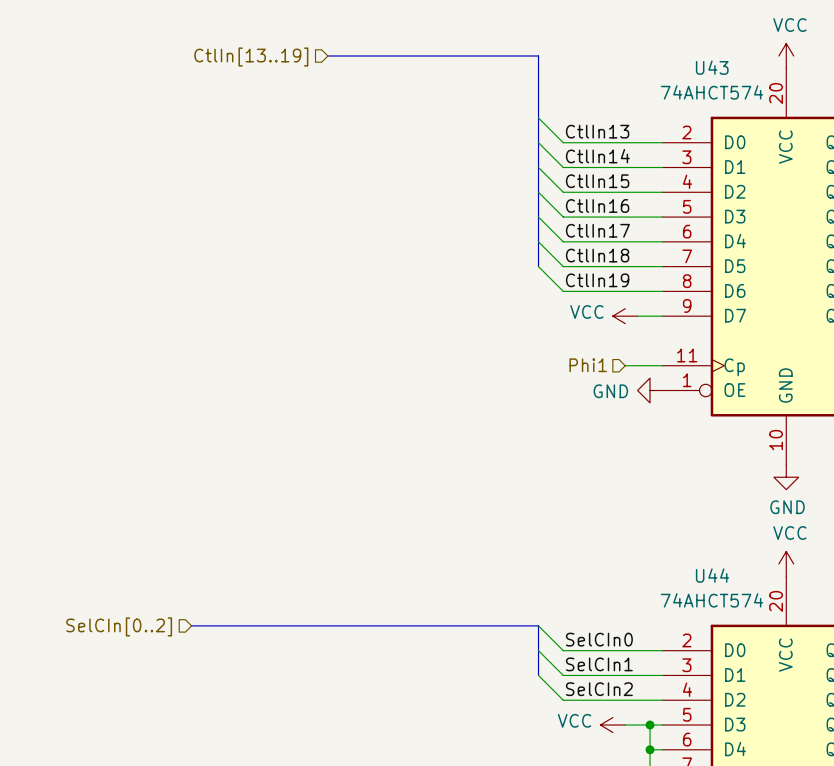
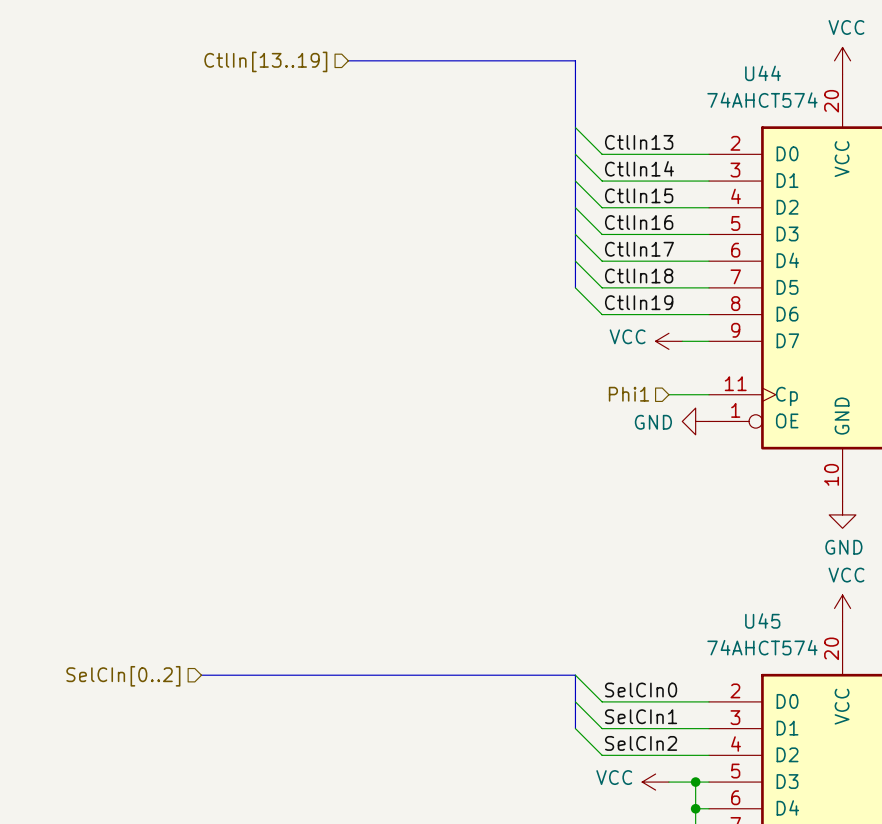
U43 name: U43 (712, 67) -> U44 (763, 73)
U44 name: U44 (712, 575) -> U45 (762, 620)

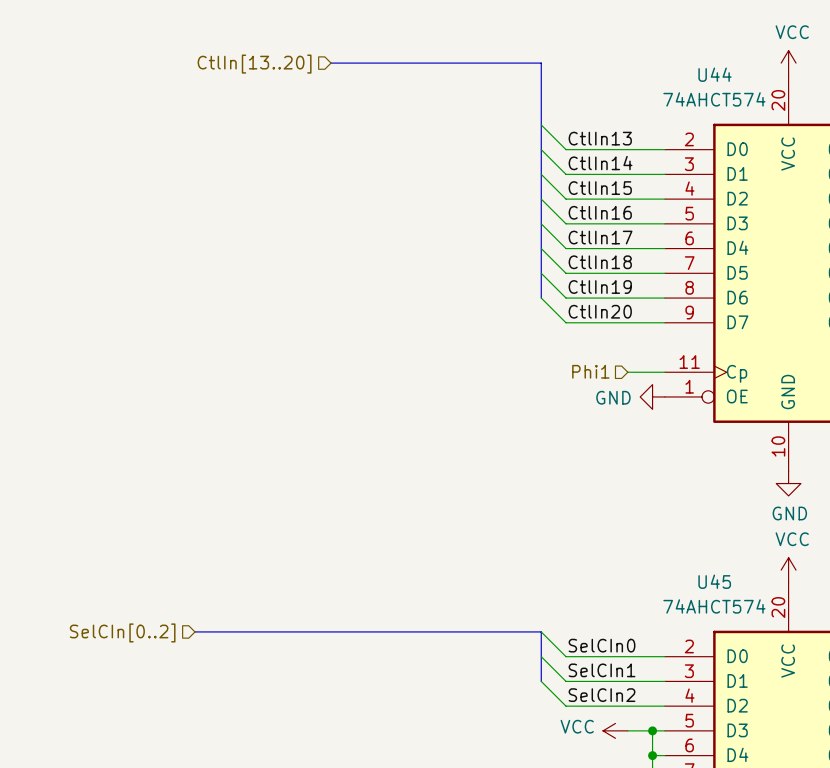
hierarchical label: CtlIn[13..19] (265, 61) -> CtlIn[13..20] (254, 64)
bus: none -> (541, 273) (541, 298)
wire: none -> (541, 298) (566, 322) (640, 322)
label: none -> CtlIn20 (600, 311)
power symbol: VCC (668, 341) -> none

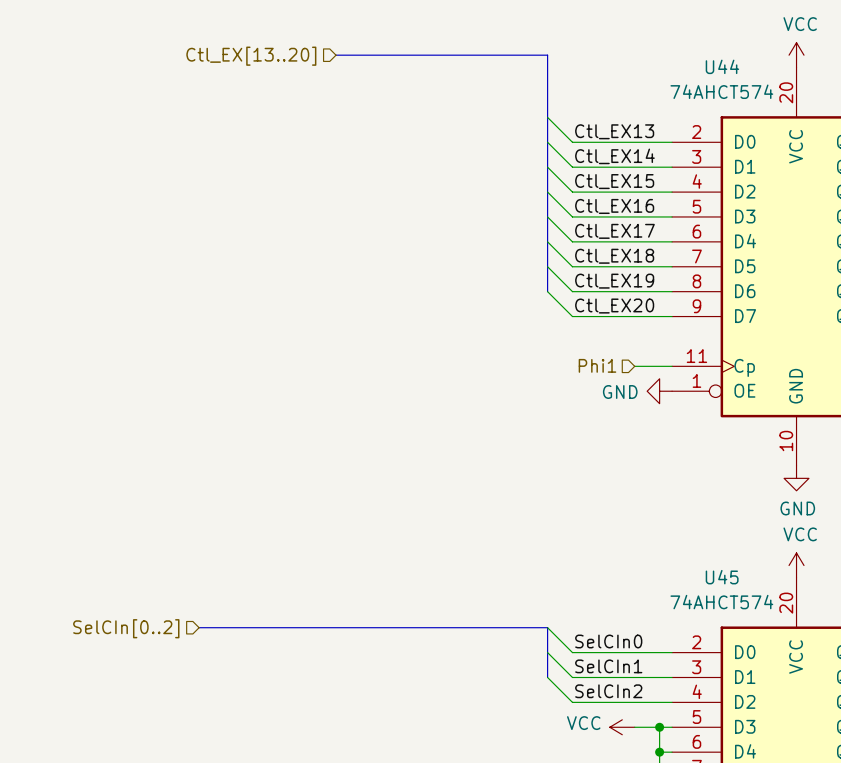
hierarchical label: CtlIn[13..20] (254, 64) -> Ctl_EX[13..20] (251, 56)
label: CtlIn13 (600, 138) -> Ctl_EX13 (614, 131)
label: CtlIn14 (600, 163) -> Ctl_EX14 (614, 156)
label: CtlIn15 (600, 188) -> Ctl_EX15 (614, 181)
label: CtlIn16 (600, 212) -> Ctl_EX16 (614, 206)
label: CtlIn17 (600, 237) -> Ctl_EX17 (614, 231)
label: CtlIn18 (600, 262) -> Ctl_EX18 (614, 256)
label: CtlIn19 (600, 287) -> Ctl_EX19 (614, 281)
label: CtlIn20 (600, 311) -> Ctl_EX20 (614, 306)

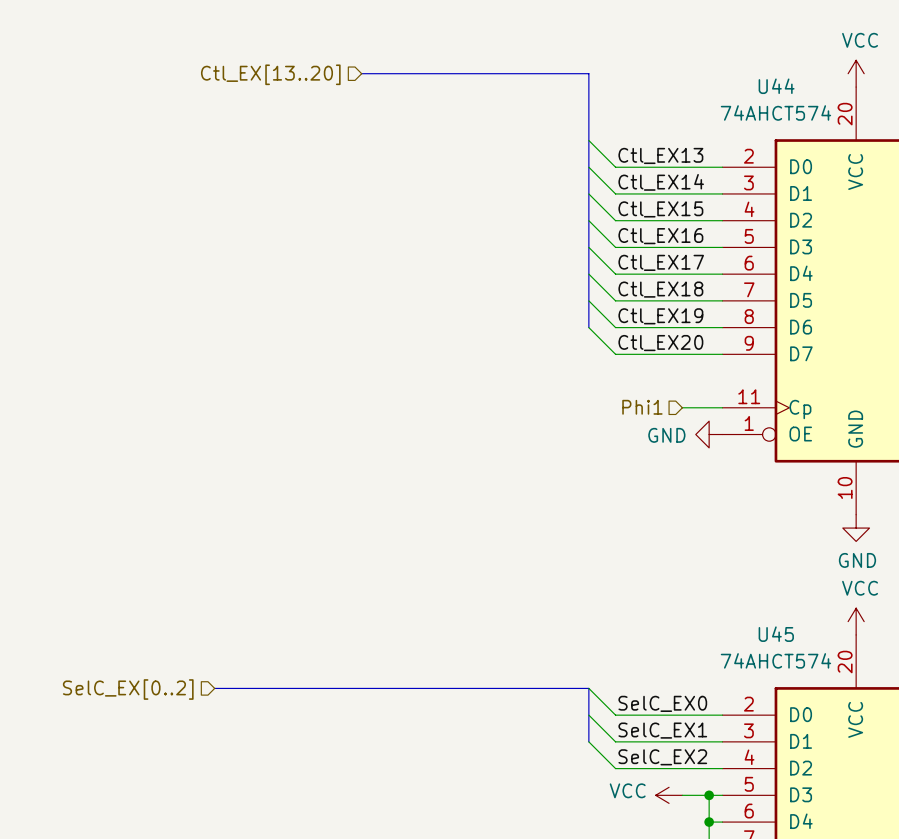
hierarchical label: SelCIn[0..2] (126, 628) -> SelC_EX[0..2] (128, 689)
label: SelCIn0 (608, 641) -> SelC_EX0 (662, 703)
label: SelCIn1 (608, 666) -> SelC_EX1 (662, 730)
label: SelCIn2 (608, 691) -> SelC_EX2 (662, 757)

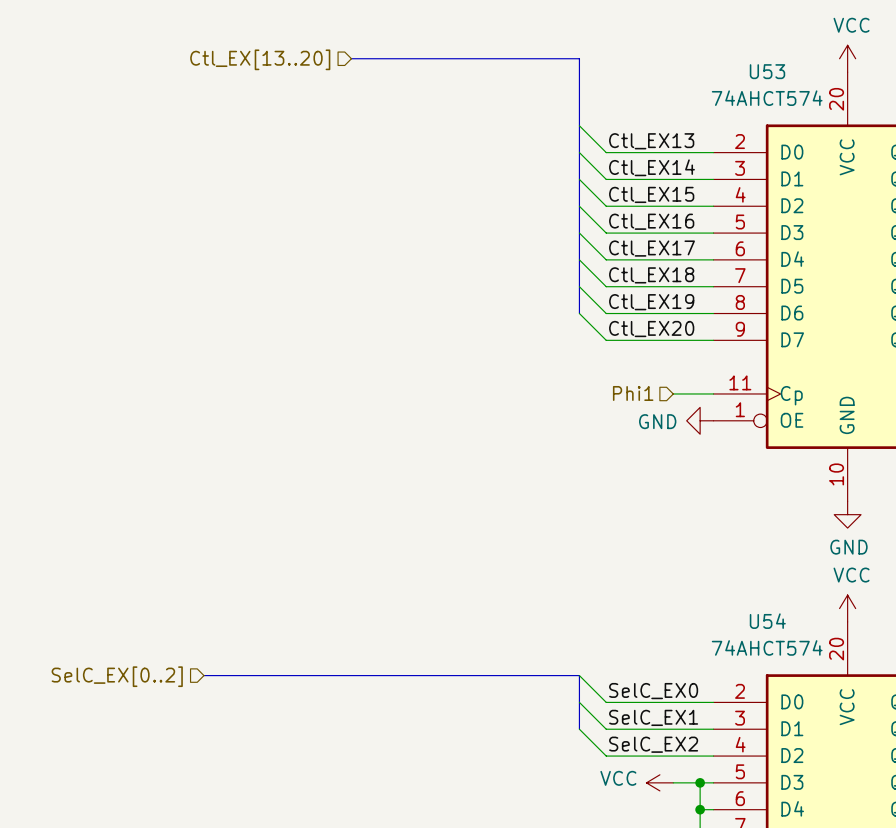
U44 name: U44 (776, 86) -> U53 (767, 71)
U45 name: U45 (776, 634) -> U54 (767, 621)

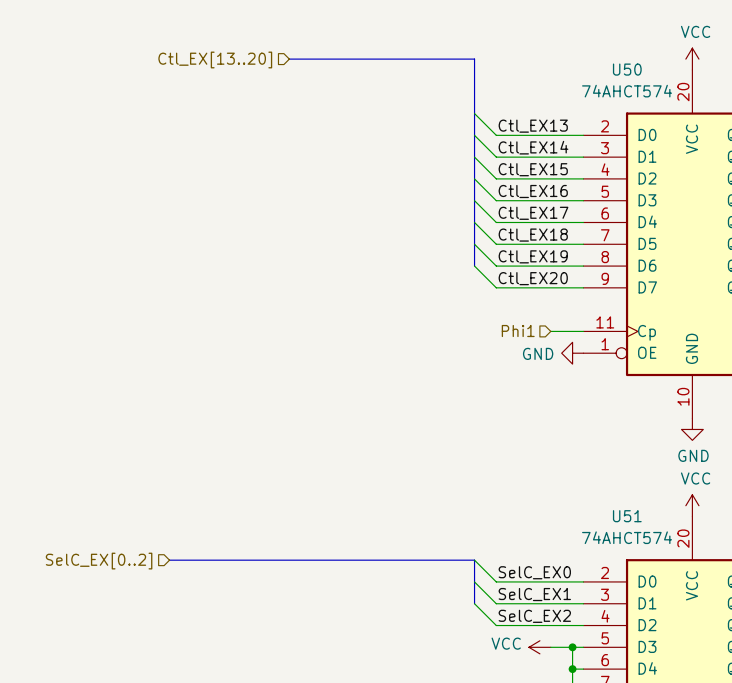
U53 name: U53 (767, 71) -> U50 (627, 69)
U54 name: U54 (767, 621) -> U51 (627, 516)

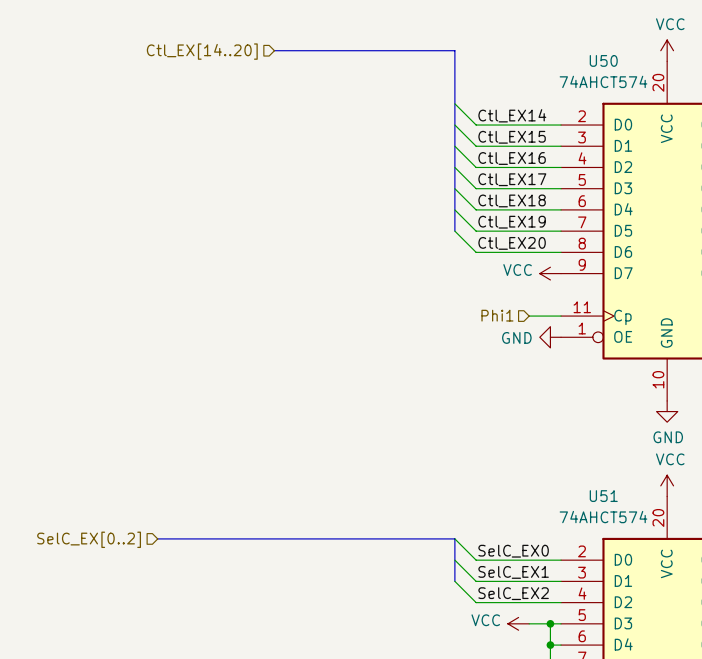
hierarchical label: Ctl_EX[13..20] (215, 59) -> Ctl_EX[14..20] (202, 51)
label: Ctl_EX13 (533, 126) -> Ctl_EX14 (512, 115)
label: Ctl_EX14 (533, 147) -> Ctl_EX15 (512, 137)
label: Ctl_EX15 (533, 169) -> Ctl_EX16 (512, 158)
label: Ctl_EX16 (533, 191) -> Ctl_EX17 (512, 179)
label: Ctl_EX17 (533, 213) -> Ctl_EX18 (512, 200)
label: Ctl_EX18 (533, 235) -> Ctl_EX19 (512, 222)
bus: (474, 244) (474, 266) -> none
label: Ctl_EX19 (533, 256) -> Ctl_EX20 (512, 243)
wire: (474, 266) (496, 287) (583, 287) -> none
label: Ctl_EX20 (533, 278) -> none
power symbol: none -> VCC (550, 273)

